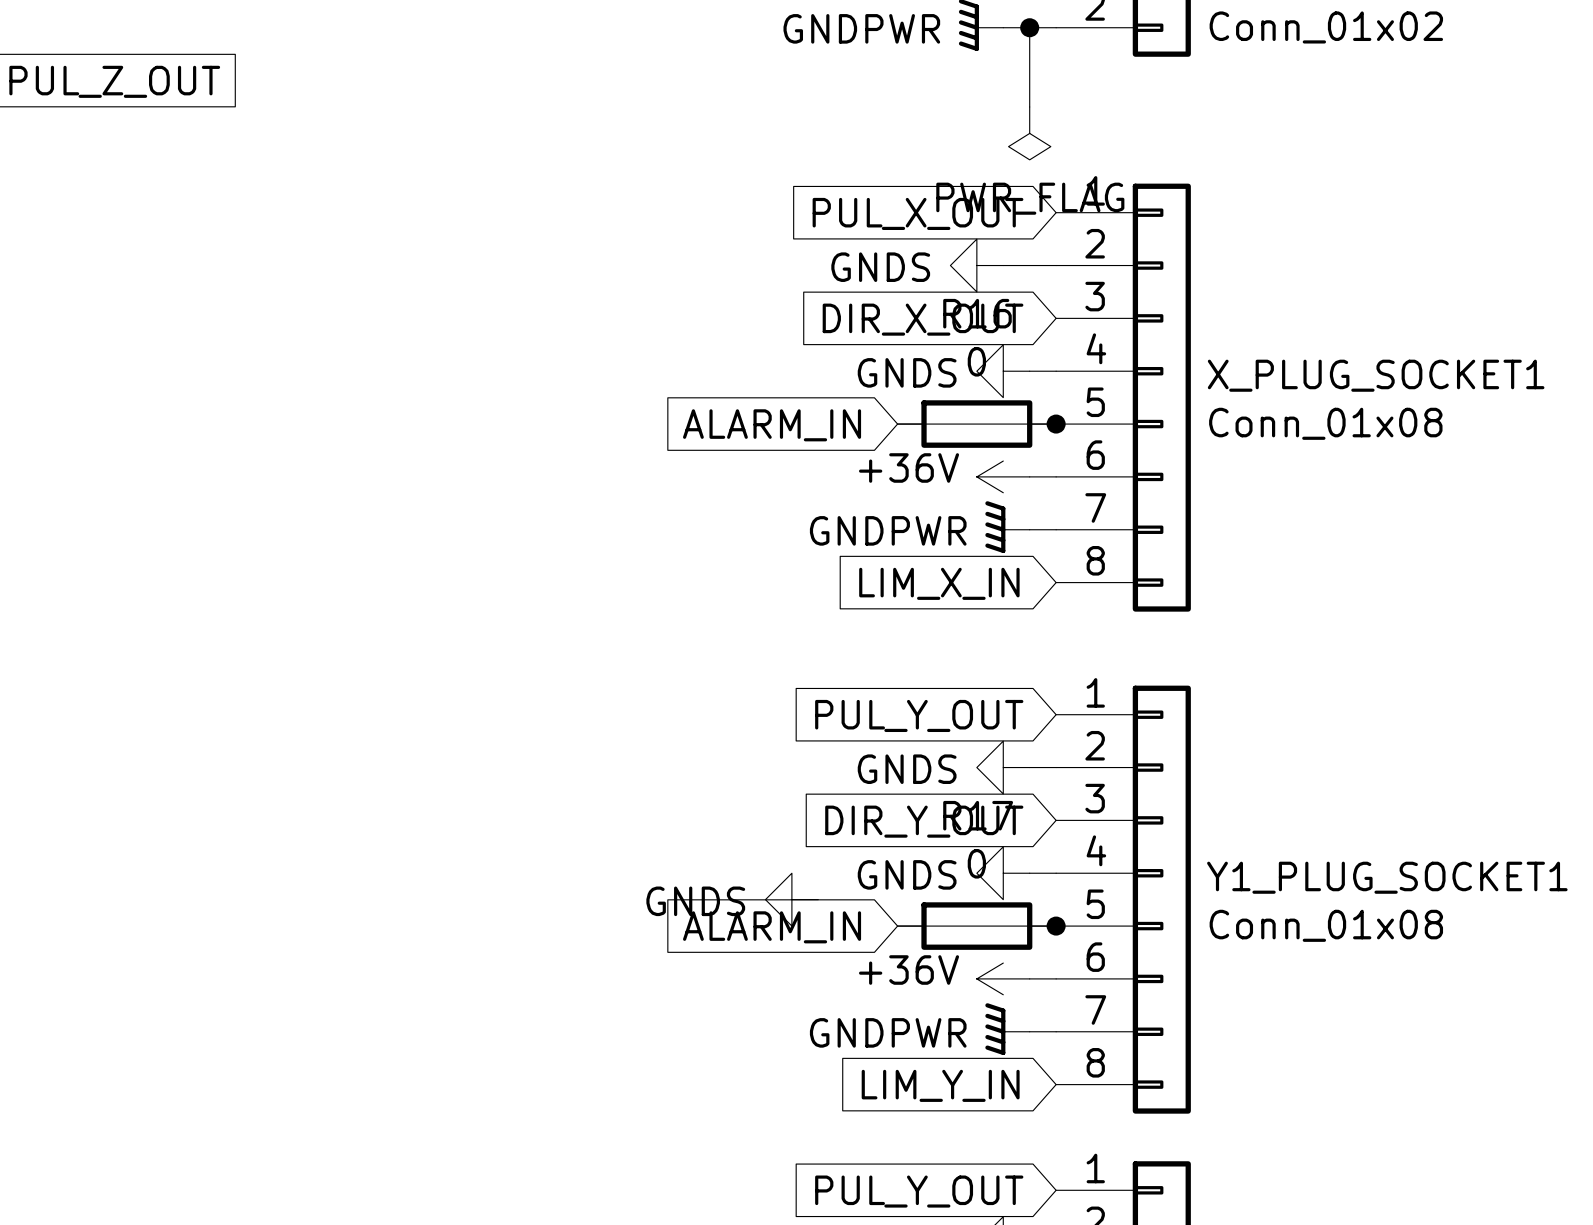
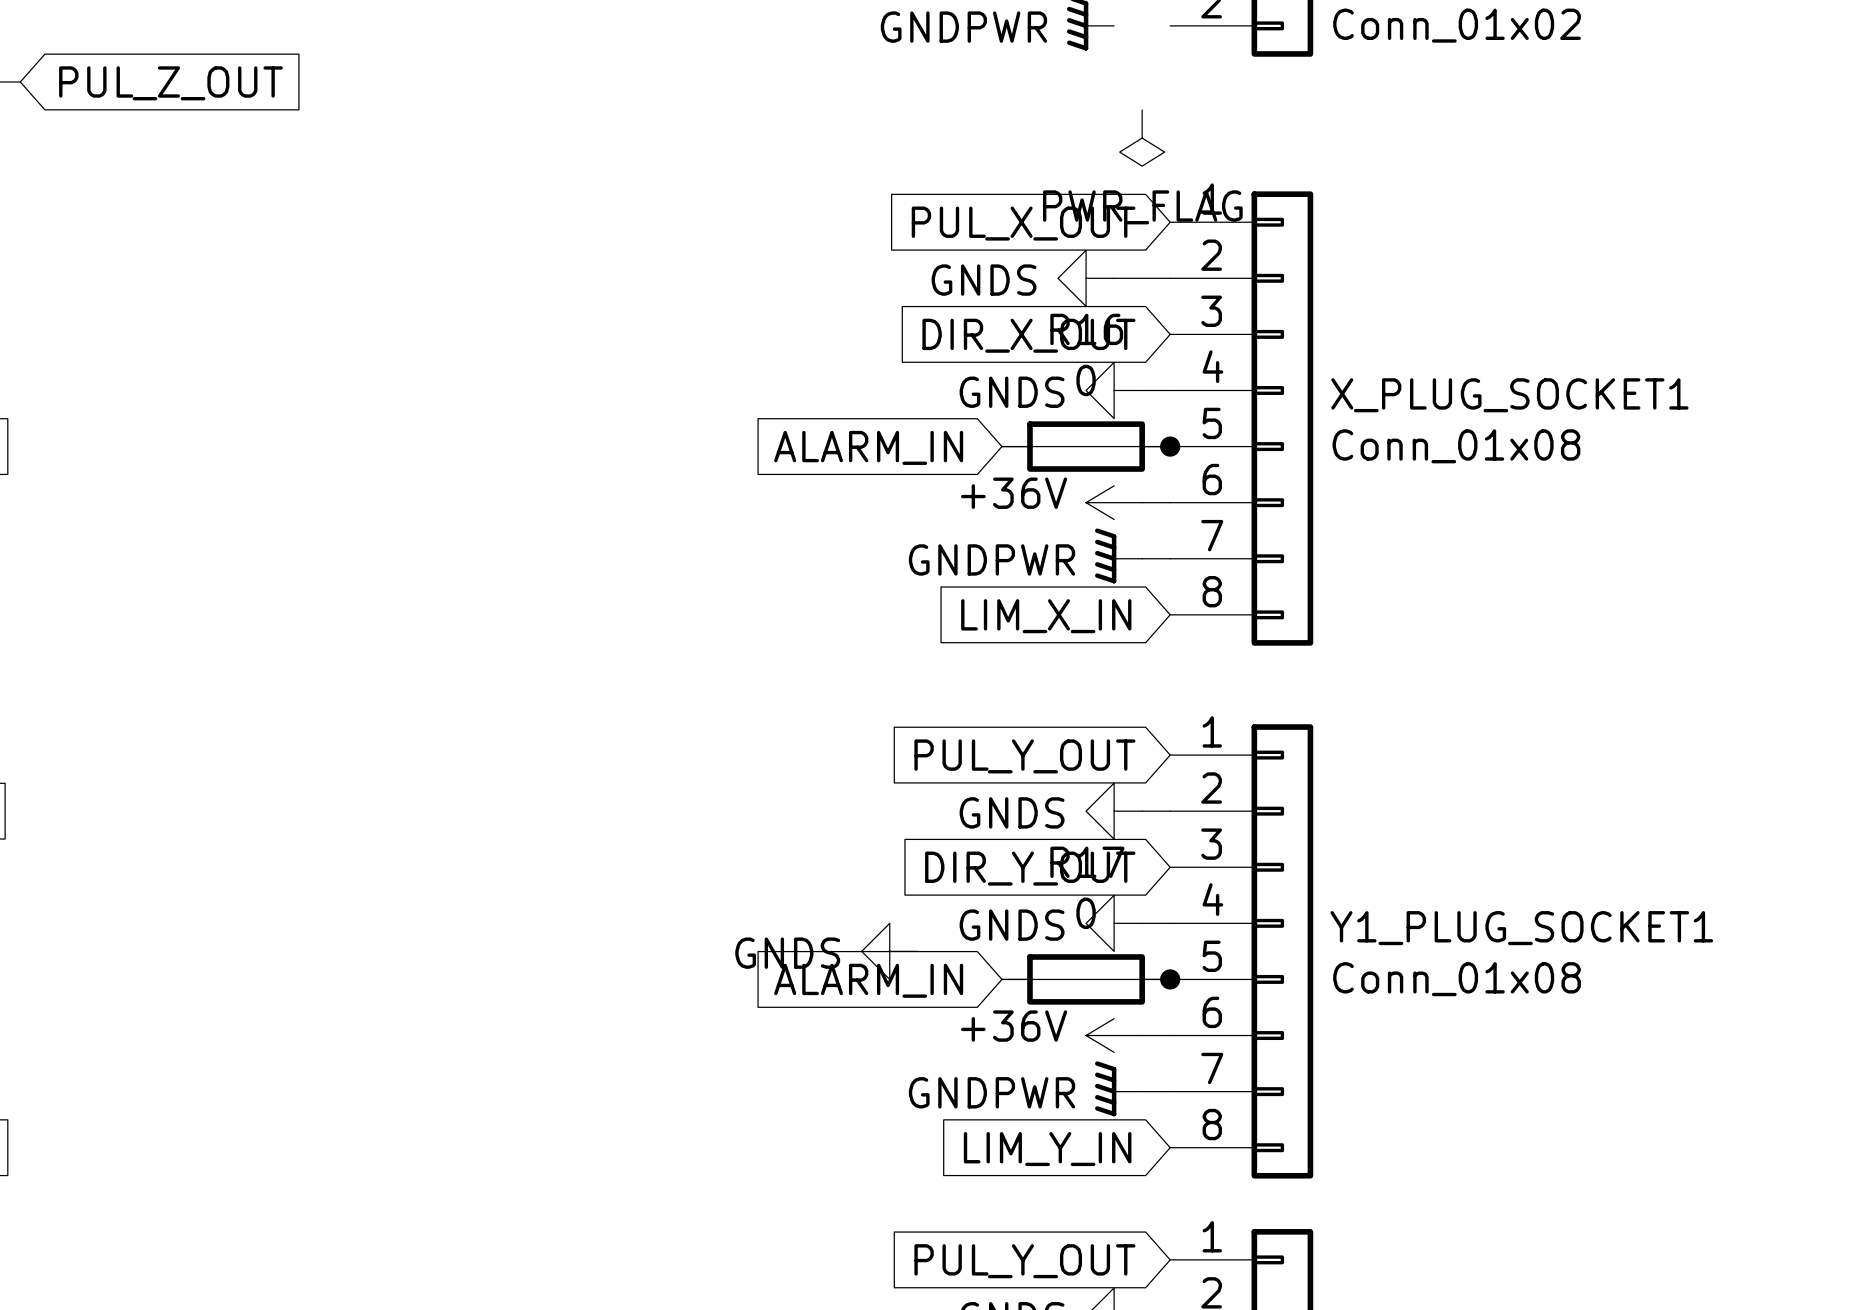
wire: (1003, 27) (1056, 27) -> none
wire: (1029, 27) (1029, 107) -> none
junction: (1029, 27) -> none

